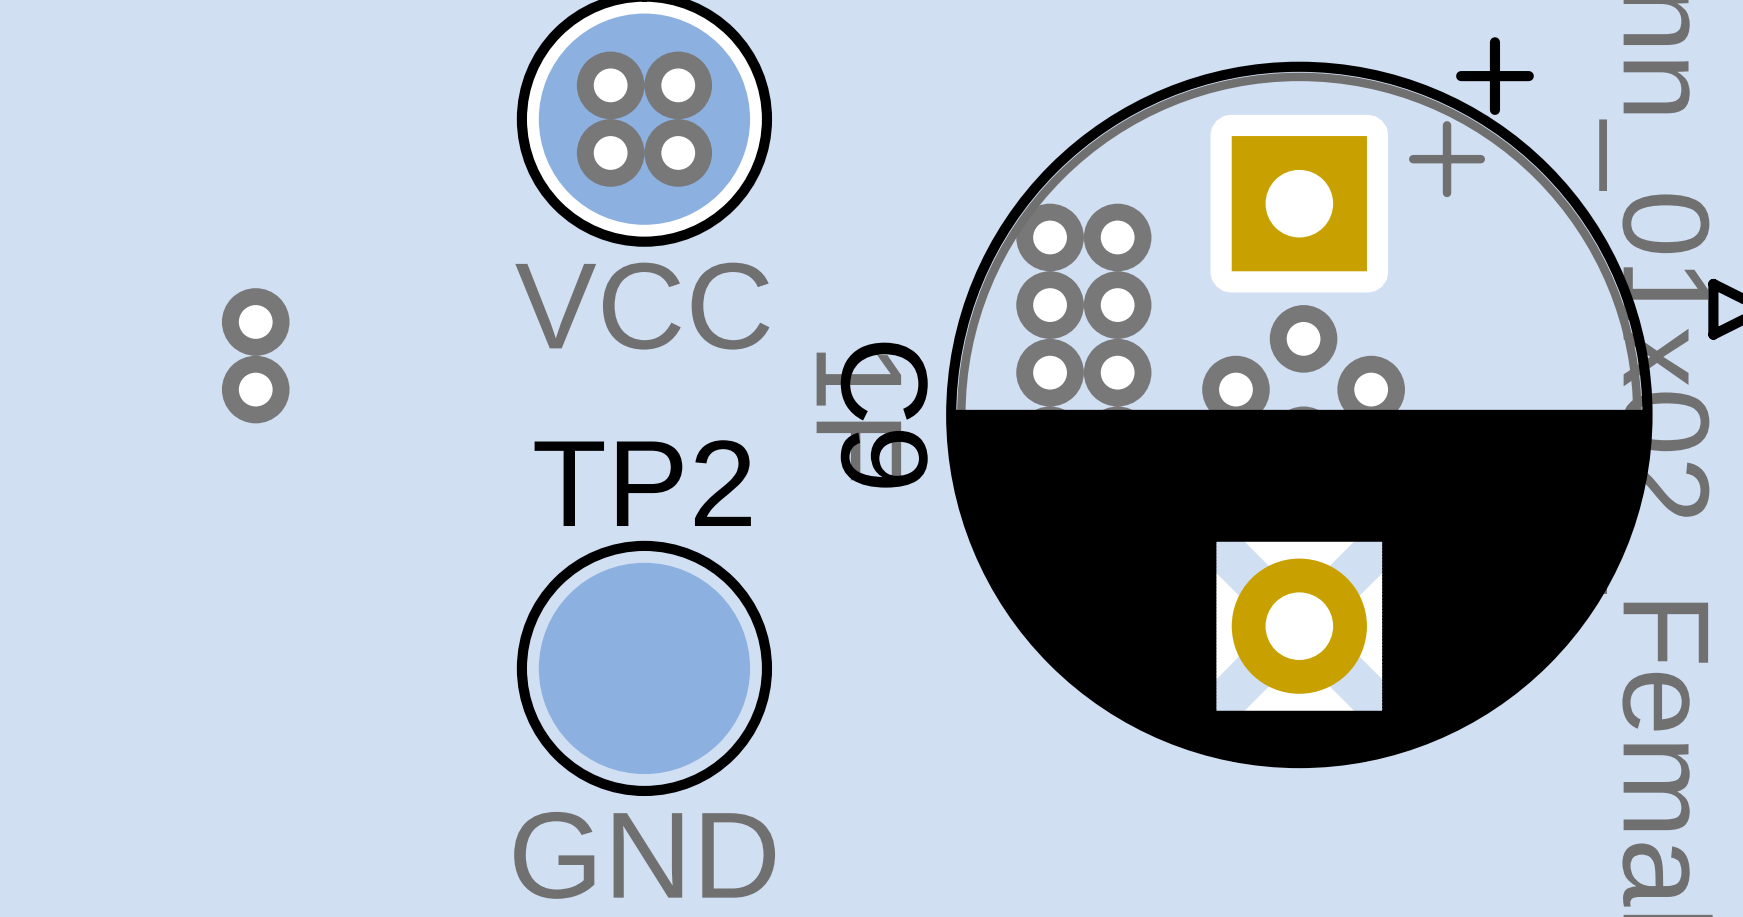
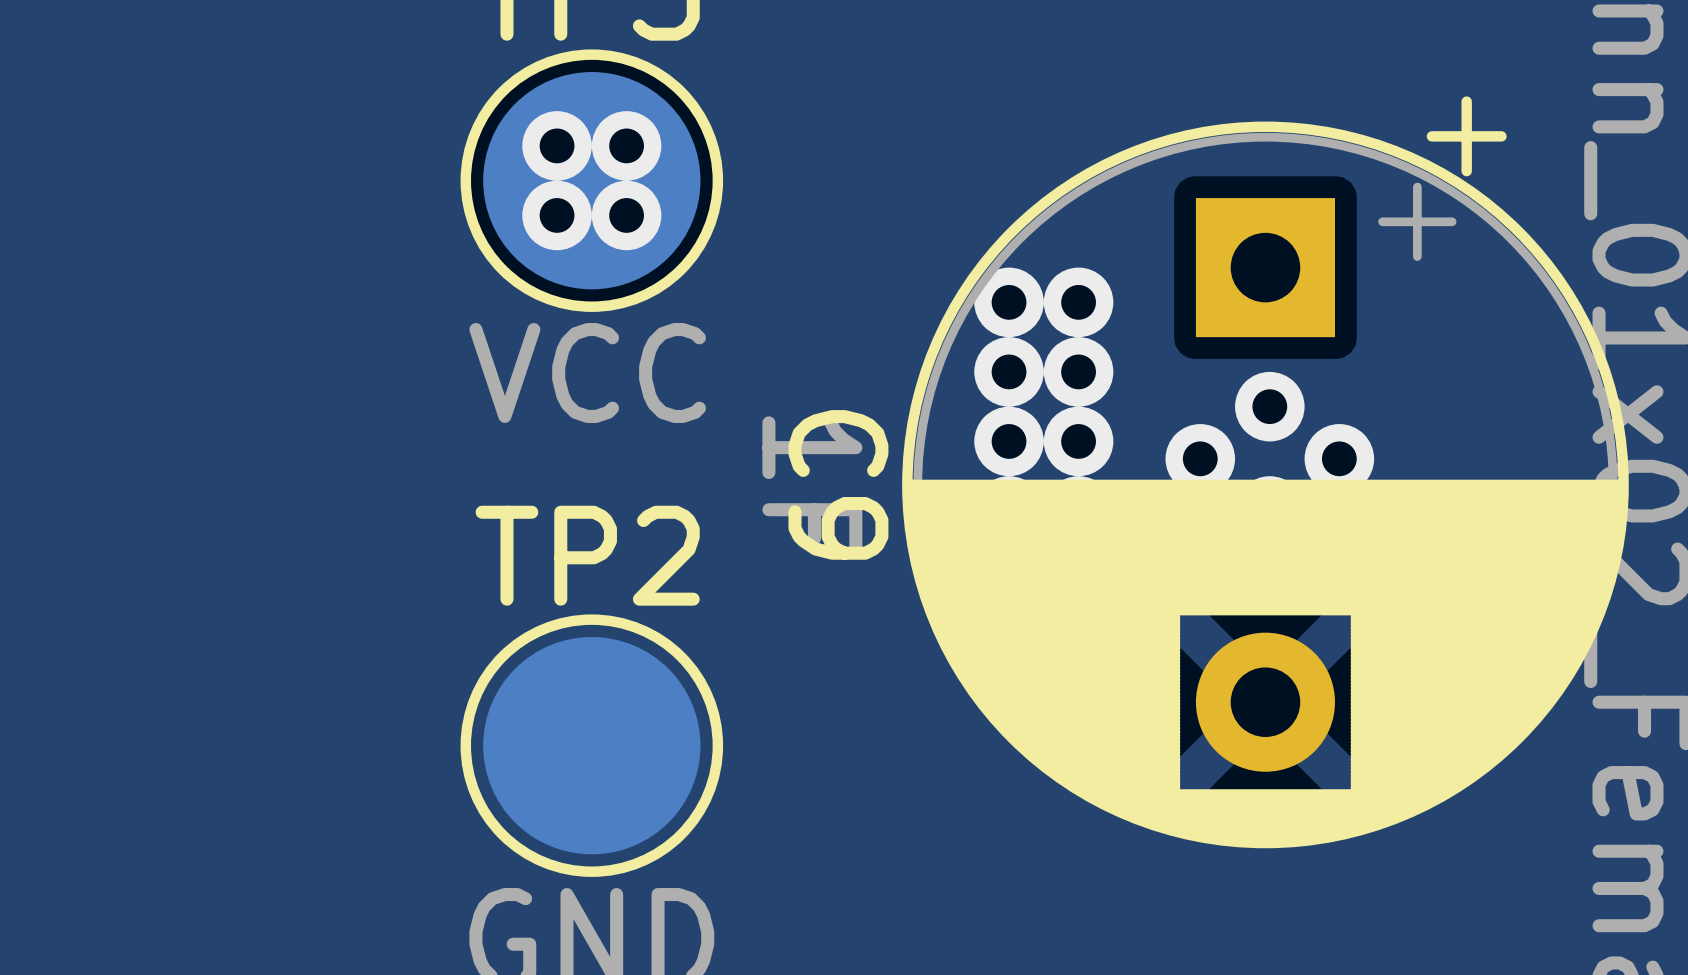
via: (255, 321) -> none
via: (255, 389) -> none

